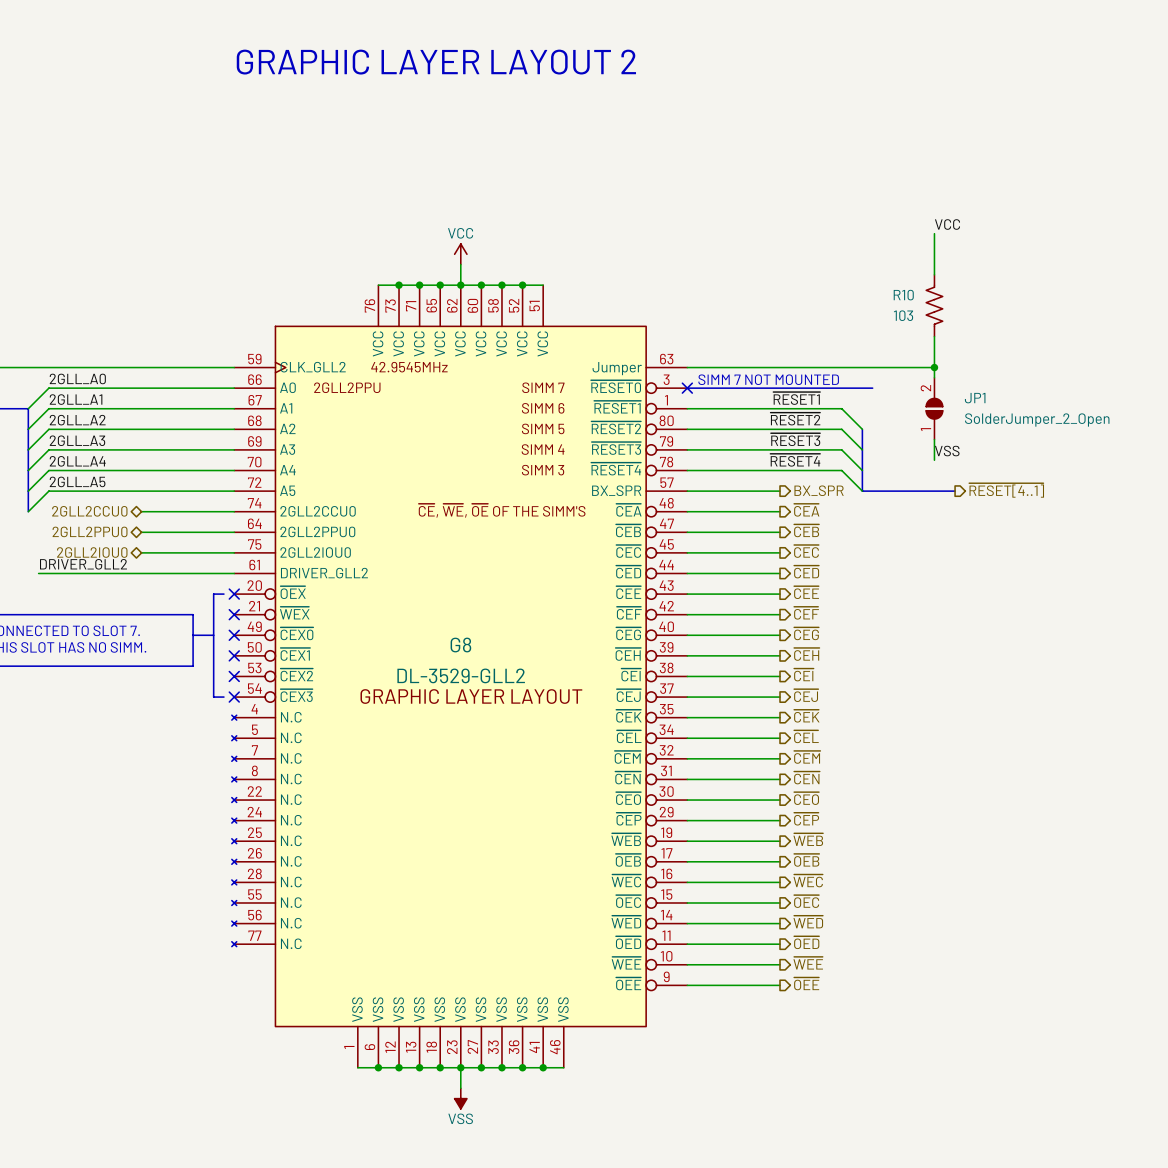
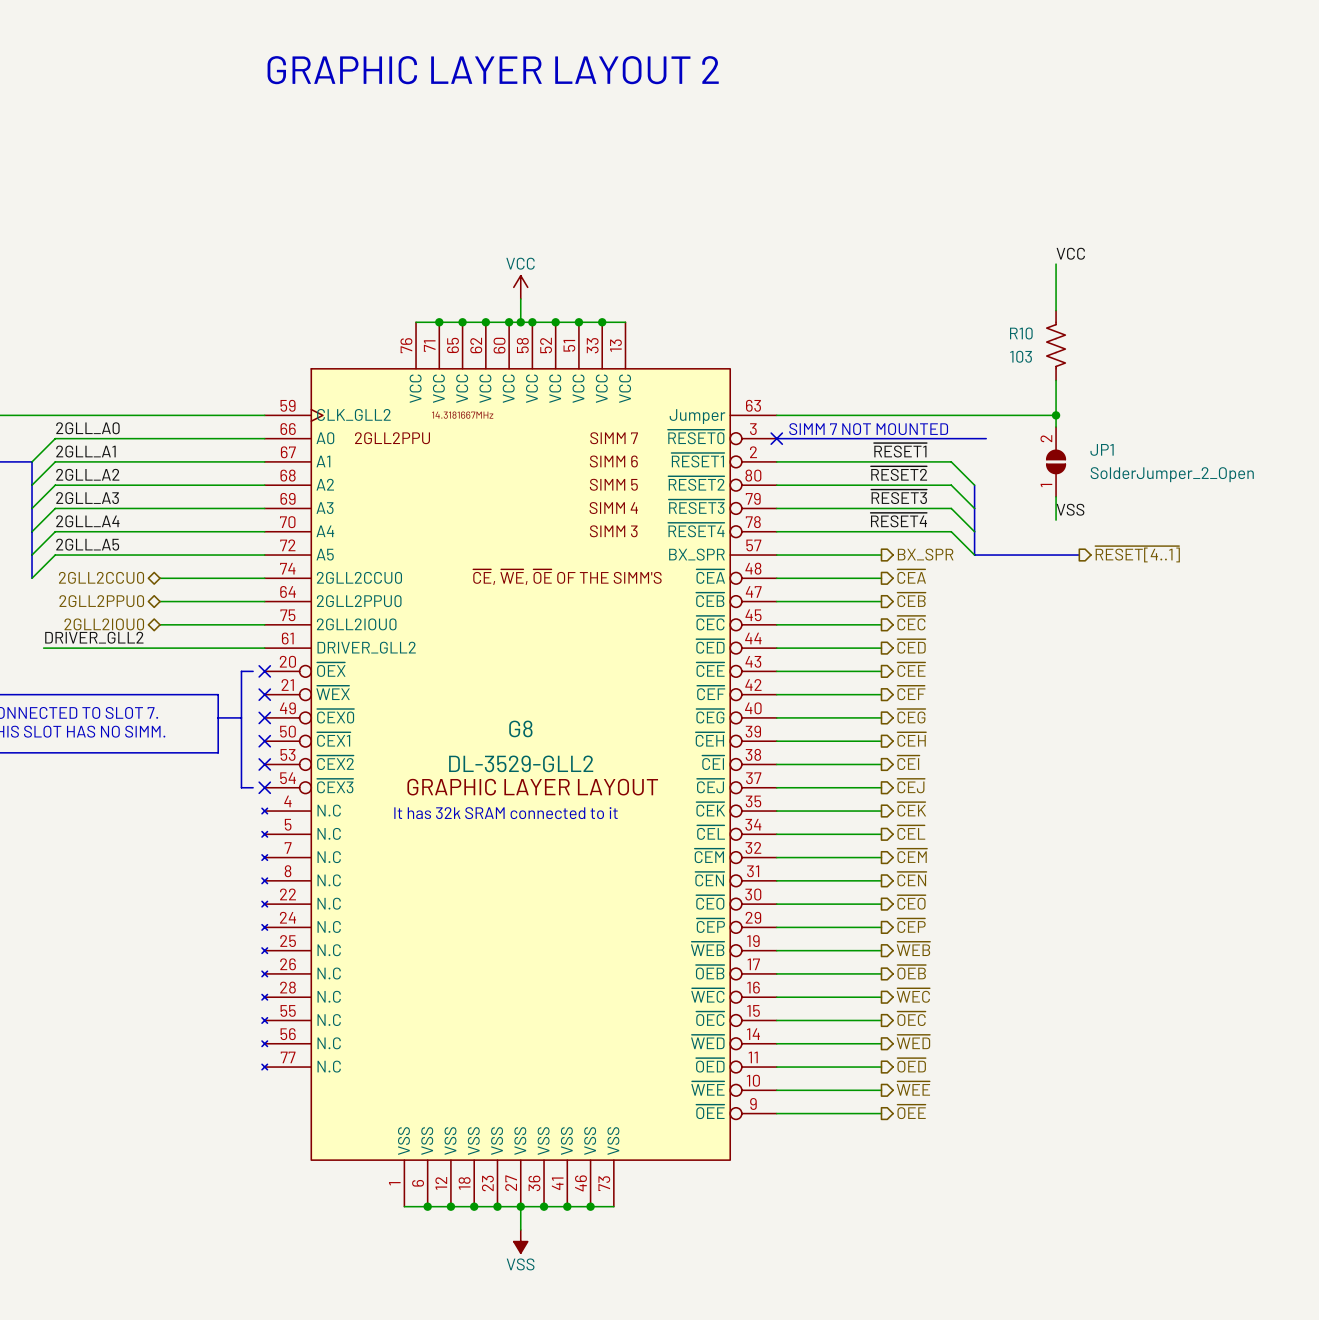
G8 symbol: [231, 285, 688, 1068] -> [261, 322, 777, 1207]
wire: none -> (416, 322) (427, 322)
junction: none -> (439, 322)
junction: (399, 285) -> none
junction: none -> (462, 322)
junction: (419, 285) -> none
junction: none -> (485, 322)
junction: (440, 285) -> none
junction: none -> (509, 322)
junction: none -> (532, 322)
junction: (481, 285) -> none
junction: none -> (555, 322)
junction: (501, 285) -> none
junction: none -> (578, 322)
junction: (522, 285) -> none
junction: none -> (602, 322)
wire: none -> (613, 322) (625, 322)
text: none -> It has 32k SRAM connected to it (506, 813)
wire: (543, 1067) (563, 1067) -> none
junction: (543, 1067) -> none

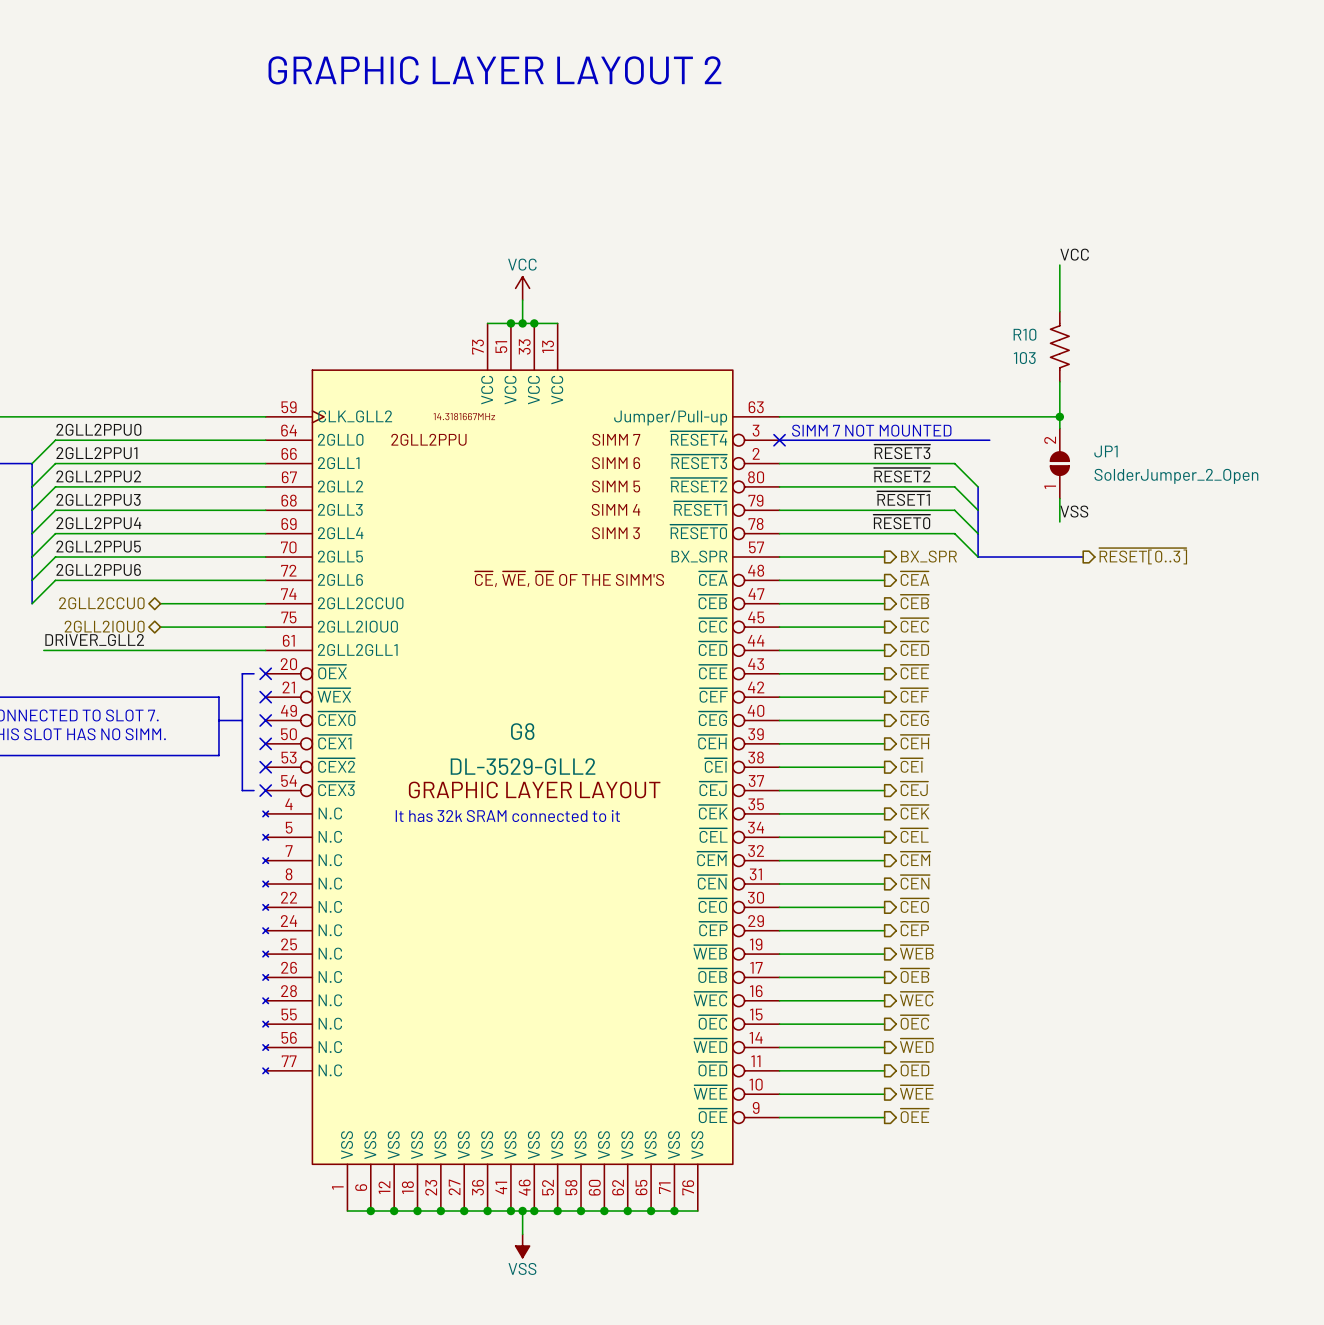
G8 symbol: [261, 322, 777, 1207] -> [262, 323, 780, 1212]
wire: (416, 322) (485, 322) -> none
junction: (439, 322) -> none
junction: (462, 322) -> none
junction: (485, 322) -> none
wire: (555, 322) (625, 322) -> none
junction: (555, 322) -> none
junction: (578, 322) -> none
junction: (602, 322) -> none
label: 2GLL_A0 (87, 428) -> 2GLL2PPU0 (98, 429)
label: ~{RESET1} (900, 450) -> ~{RESET3} (902, 451)
label: 2GLL_A1 (85, 451) -> 2GLL2PPU1 (96, 453)
label: 2GLL_A2 (87, 474) -> 2GLL2PPU2 (98, 476)
label: ~{RESET3} (899, 496) -> ~{RESET1} (903, 498)
label: 2GLL_A3 (87, 498) -> 2GLL2PPU3 (98, 499)
label: ~{RESET4} (898, 520) -> ~{RESET0} (901, 521)
label: 2GLL_A4 (87, 521) -> 2GLL2PPU4 (98, 523)
label: 2GLL_A5 (87, 544) -> 2GLL2PPU5 (98, 546)
hierarchical label: ~{RESET[4..1]} (1137, 554) -> ~{RESET[0..3]} (1143, 556)
label: none -> 2GLL2PPU6 (98, 569)
hierarchical label: 2GLL2CCU0 (101, 577) -> none
bus: none -> (32, 580) (32, 603)
wire: none -> (160, 580) (55, 580) (32, 603)
hierarchical label: 2GLL2PPU0 (101, 601) -> 2GLL2CCU0 (101, 603)
wire: none -> (347, 1211) (405, 1211)
junction: none -> (370, 1211)
junction: none -> (394, 1211)
junction: none -> (417, 1211)
junction: (427, 1206) -> none
junction: none -> (440, 1211)
junction: (450, 1206) -> none
junction: none -> (464, 1211)
junction: (474, 1206) -> none
junction: none -> (487, 1211)
junction: (497, 1206) -> none
junction: none -> (510, 1211)
junction: none -> (534, 1211)
junction: (544, 1206) -> none
junction: none -> (557, 1211)
junction: (567, 1206) -> none
junction: none -> (581, 1211)
junction: (590, 1206) -> none
junction: none -> (604, 1211)
wire: none -> (616, 1211) (697, 1211)
junction: none -> (627, 1211)
junction: none -> (651, 1211)
junction: none -> (674, 1211)

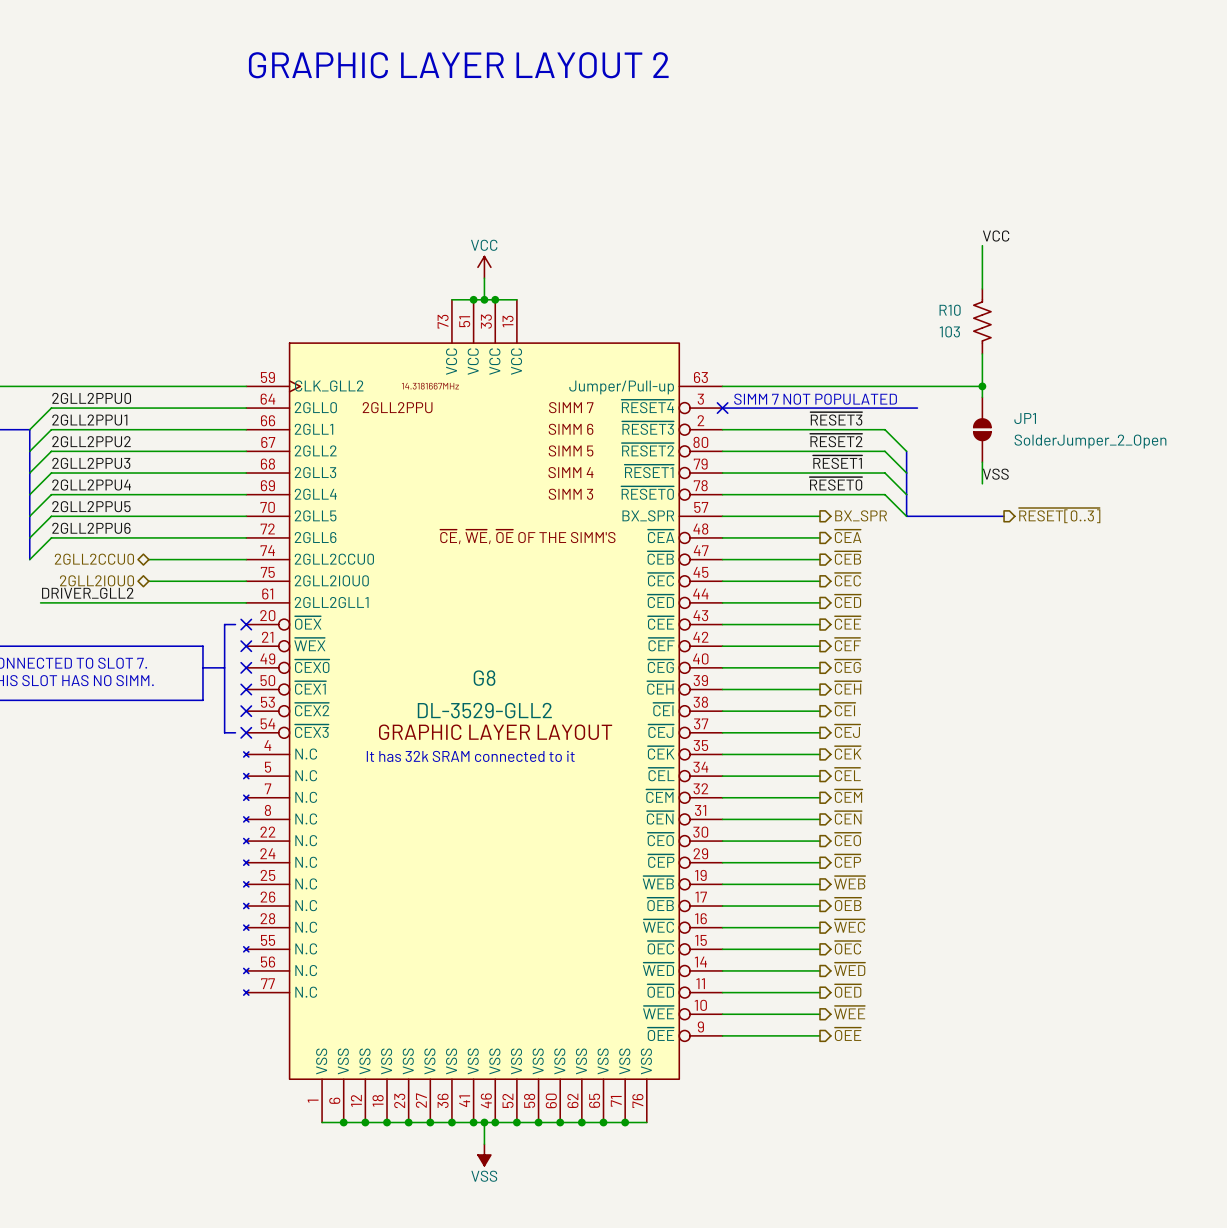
text: SIMM 7 NOT MOUNTED (871, 430) -> SIMM 7 NOT POPULATED (815, 399)
JP1 pin number: 2 (1050, 440) -> none
JP1 pin number: 1 (1050, 487) -> none

